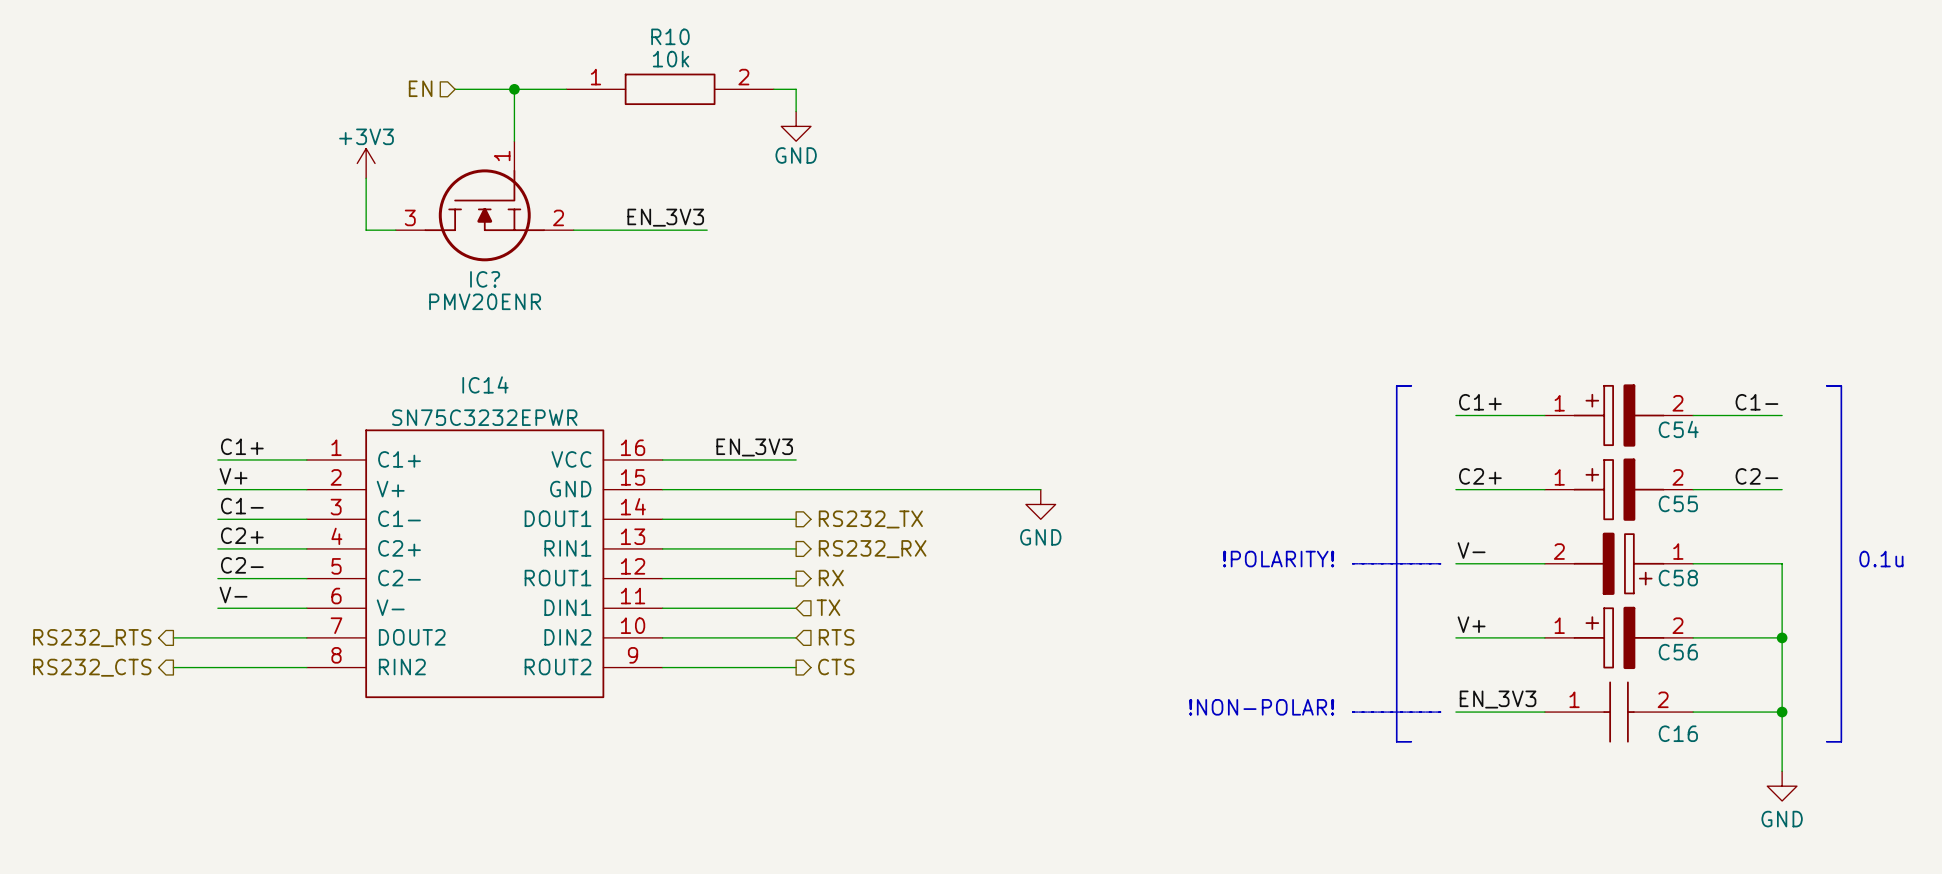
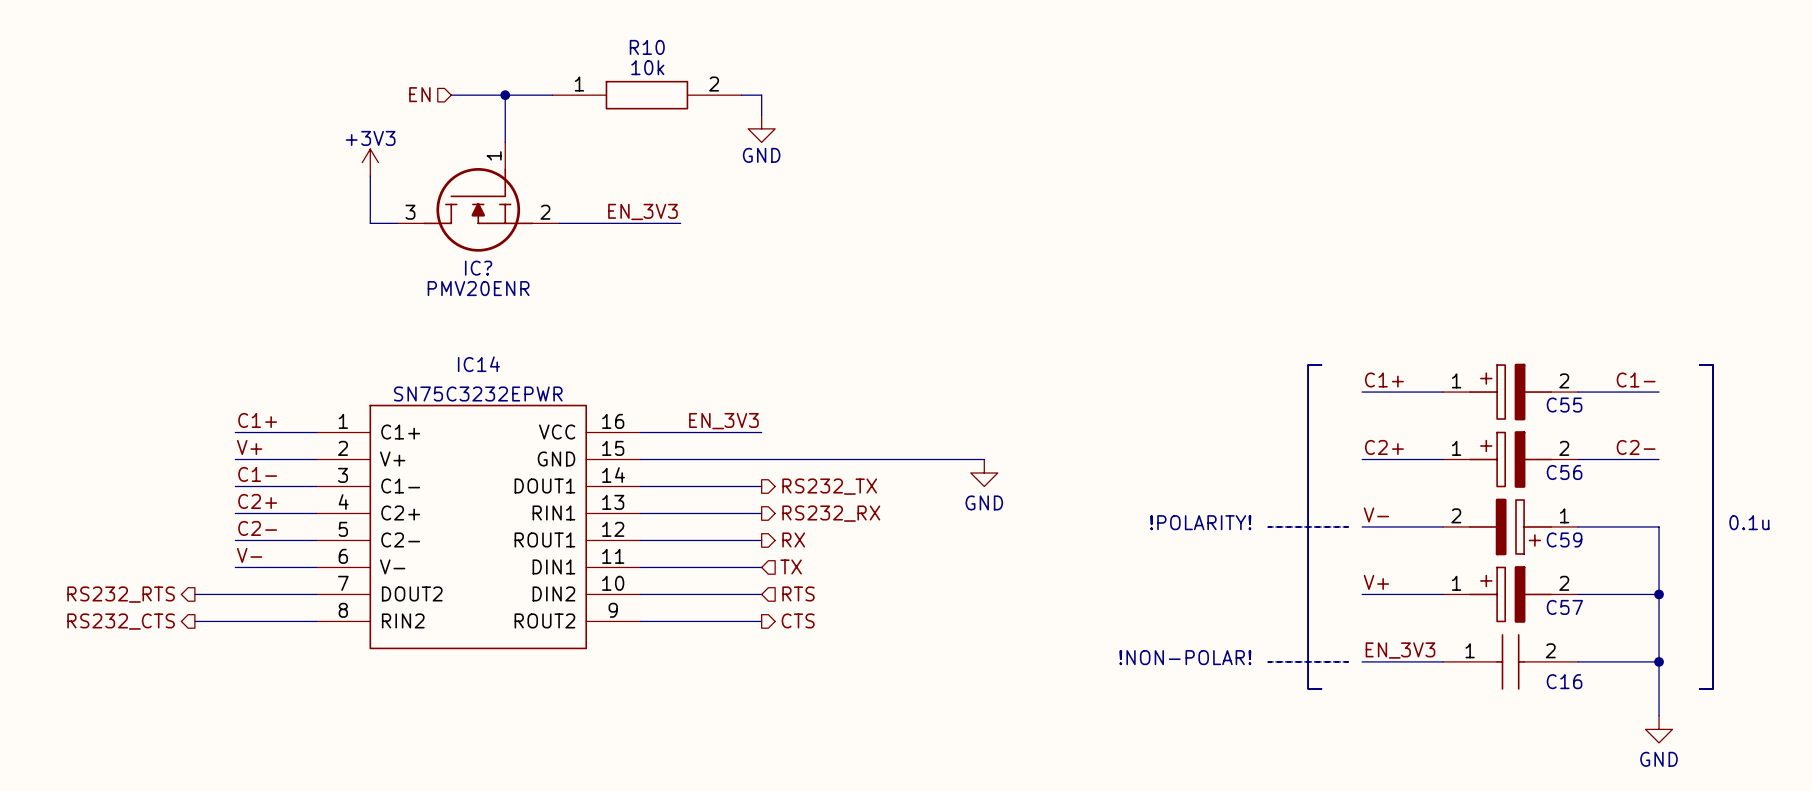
C54 name: C54 (1678, 429) -> C55 (1564, 405)
C55 name: C55 (1678, 503) -> C56 (1564, 472)
C58 name: C58 (1678, 578) -> C59 (1564, 539)
C56 name: C56 (1678, 652) -> C57 (1564, 607)

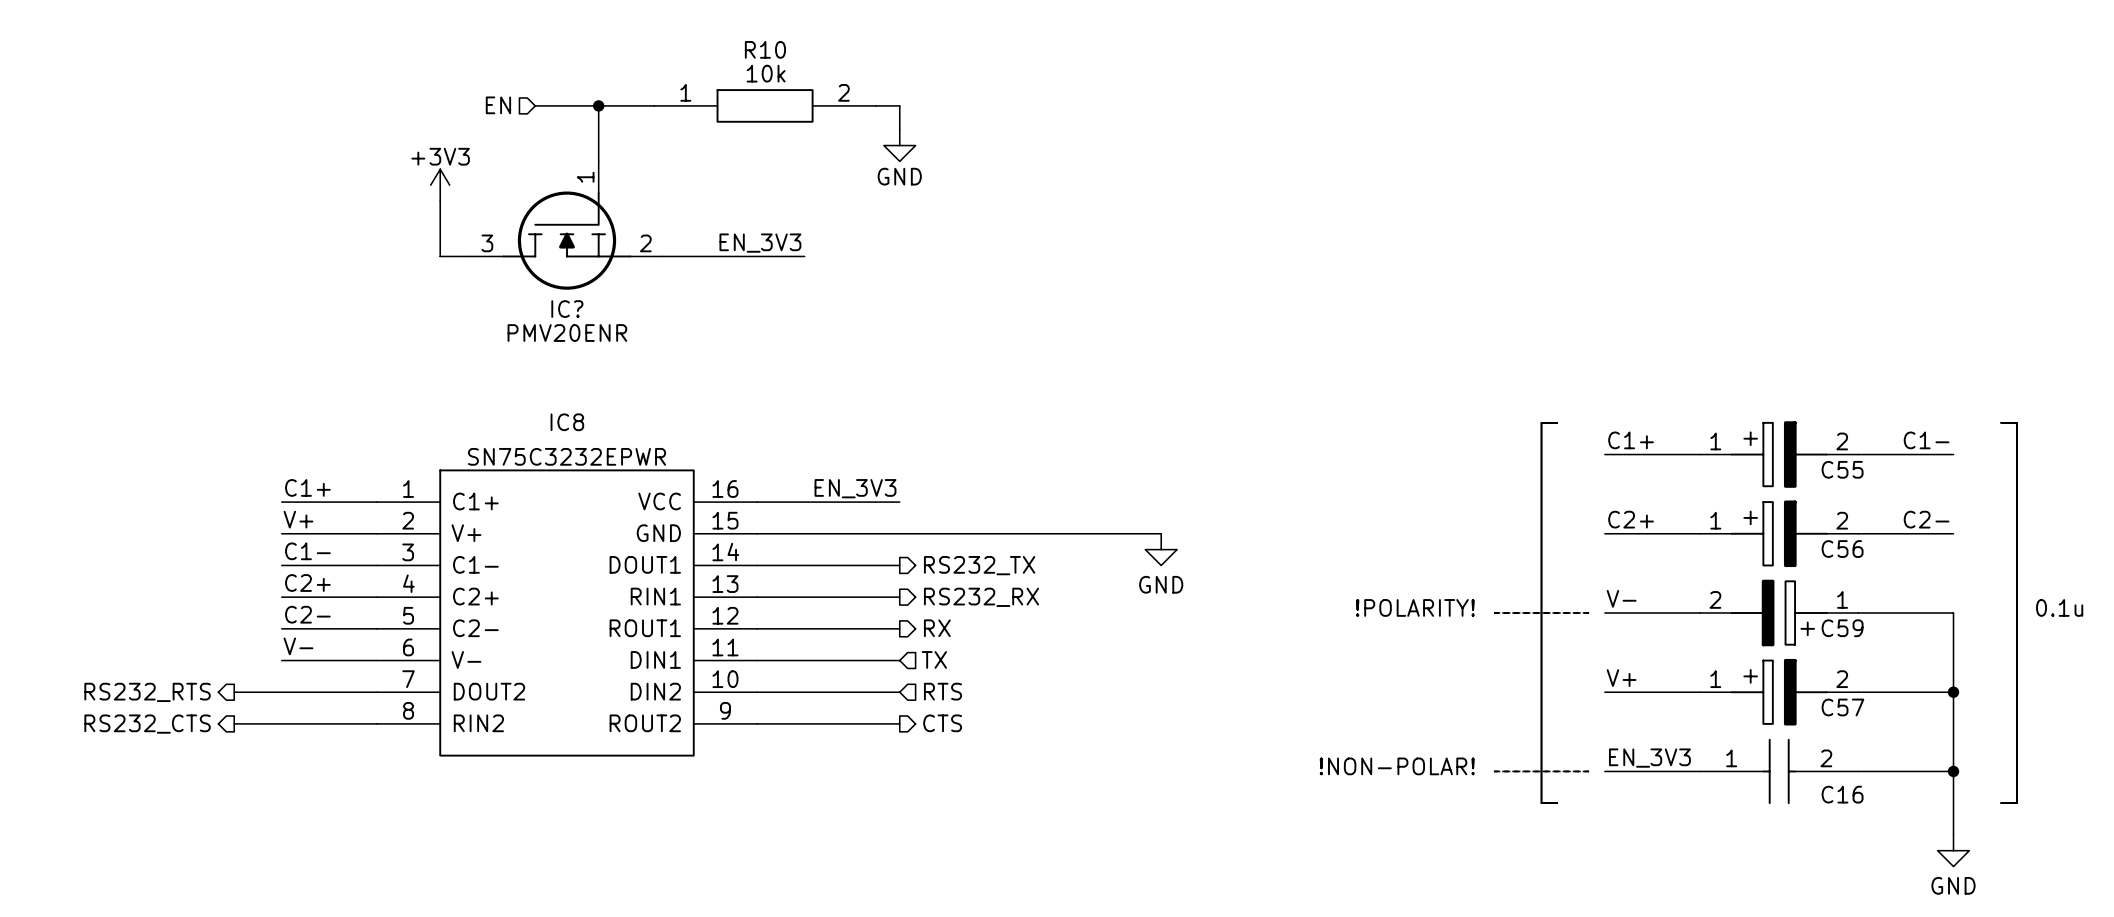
IC14 name: IC14 (478, 364) -> IC8 (567, 422)

